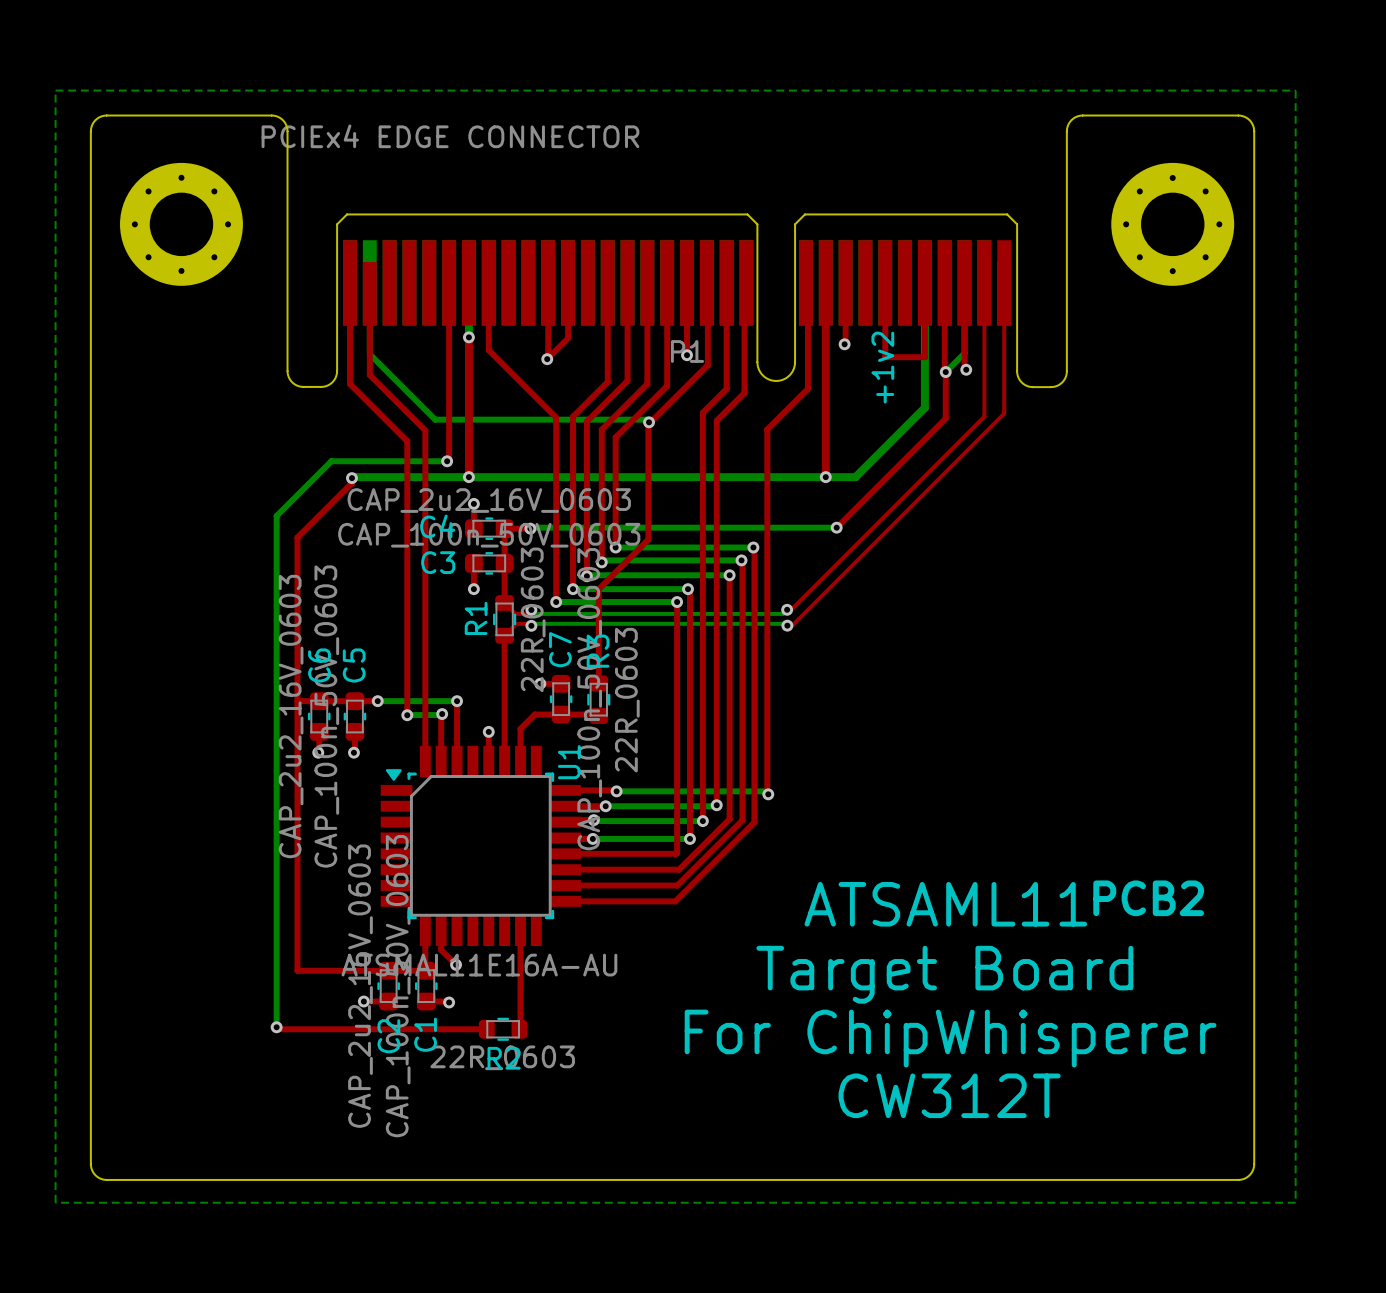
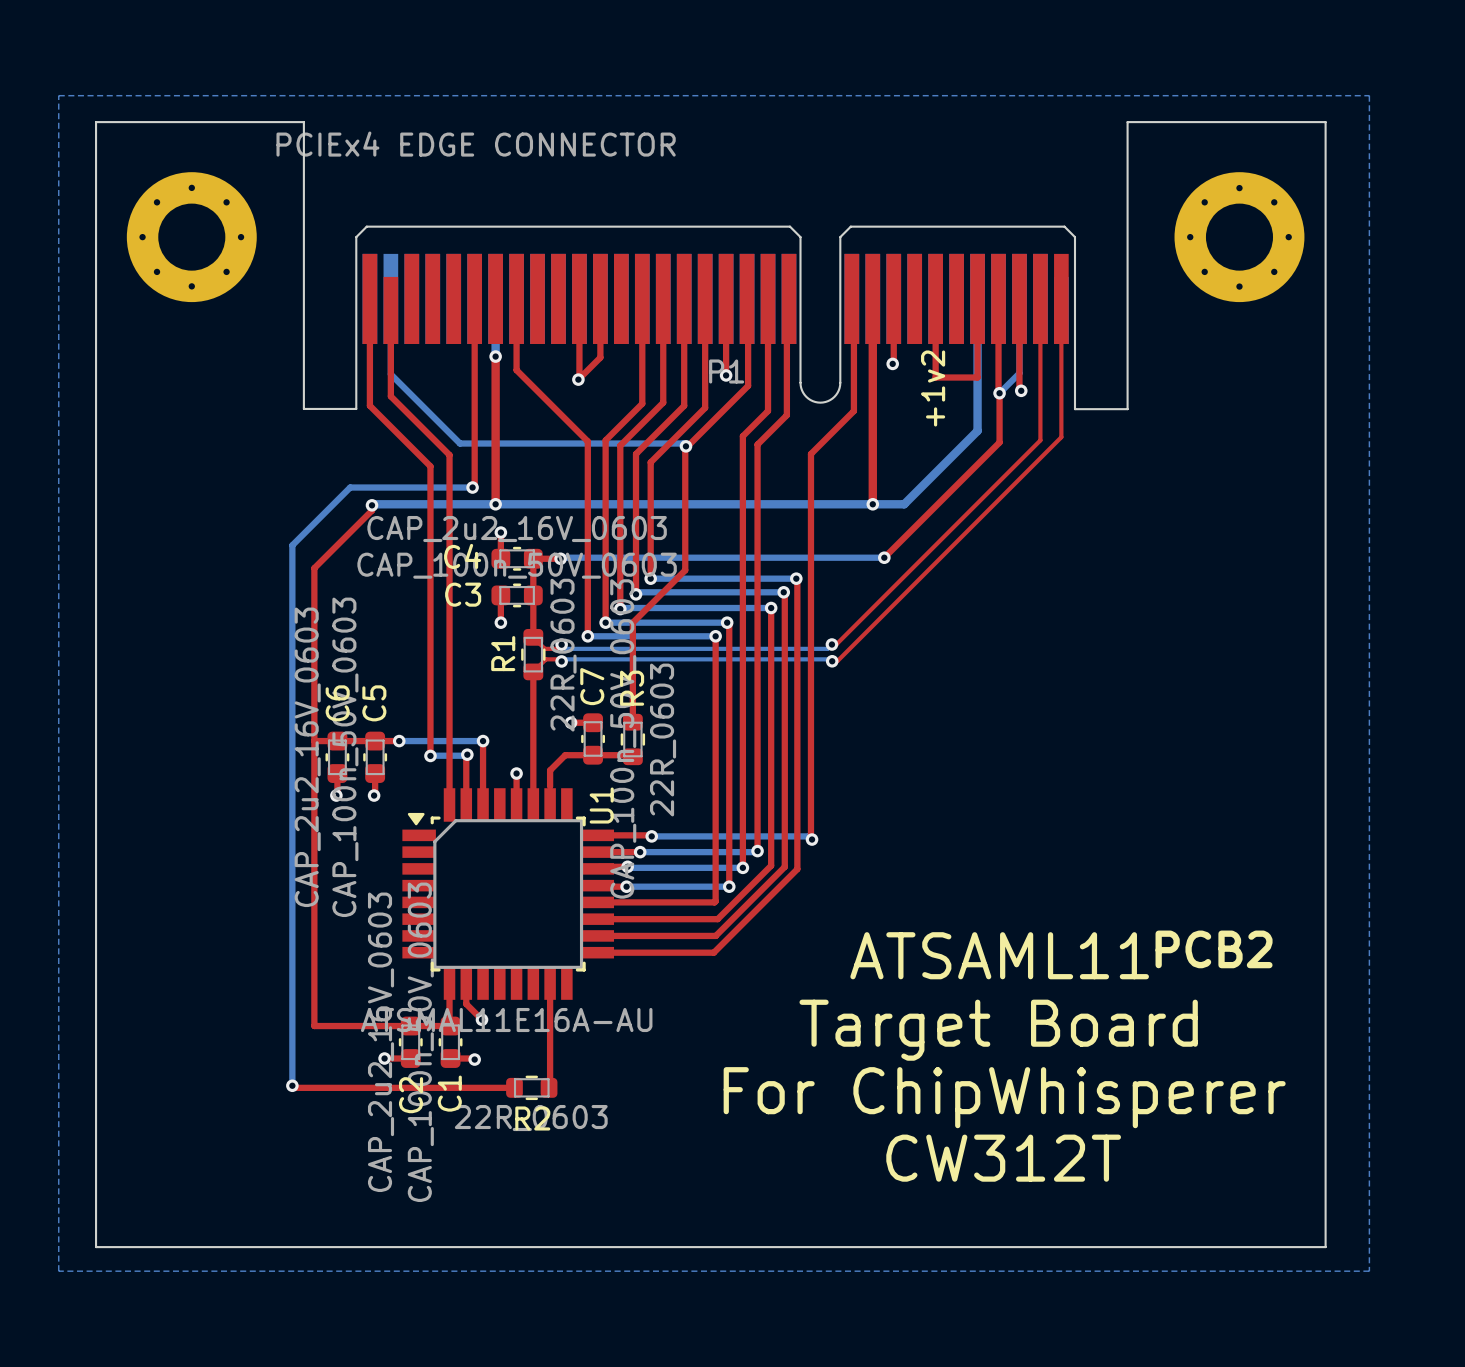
P1 footprint: [89, 114, 1256, 1181] -> [94, 121, 1327, 1249]

